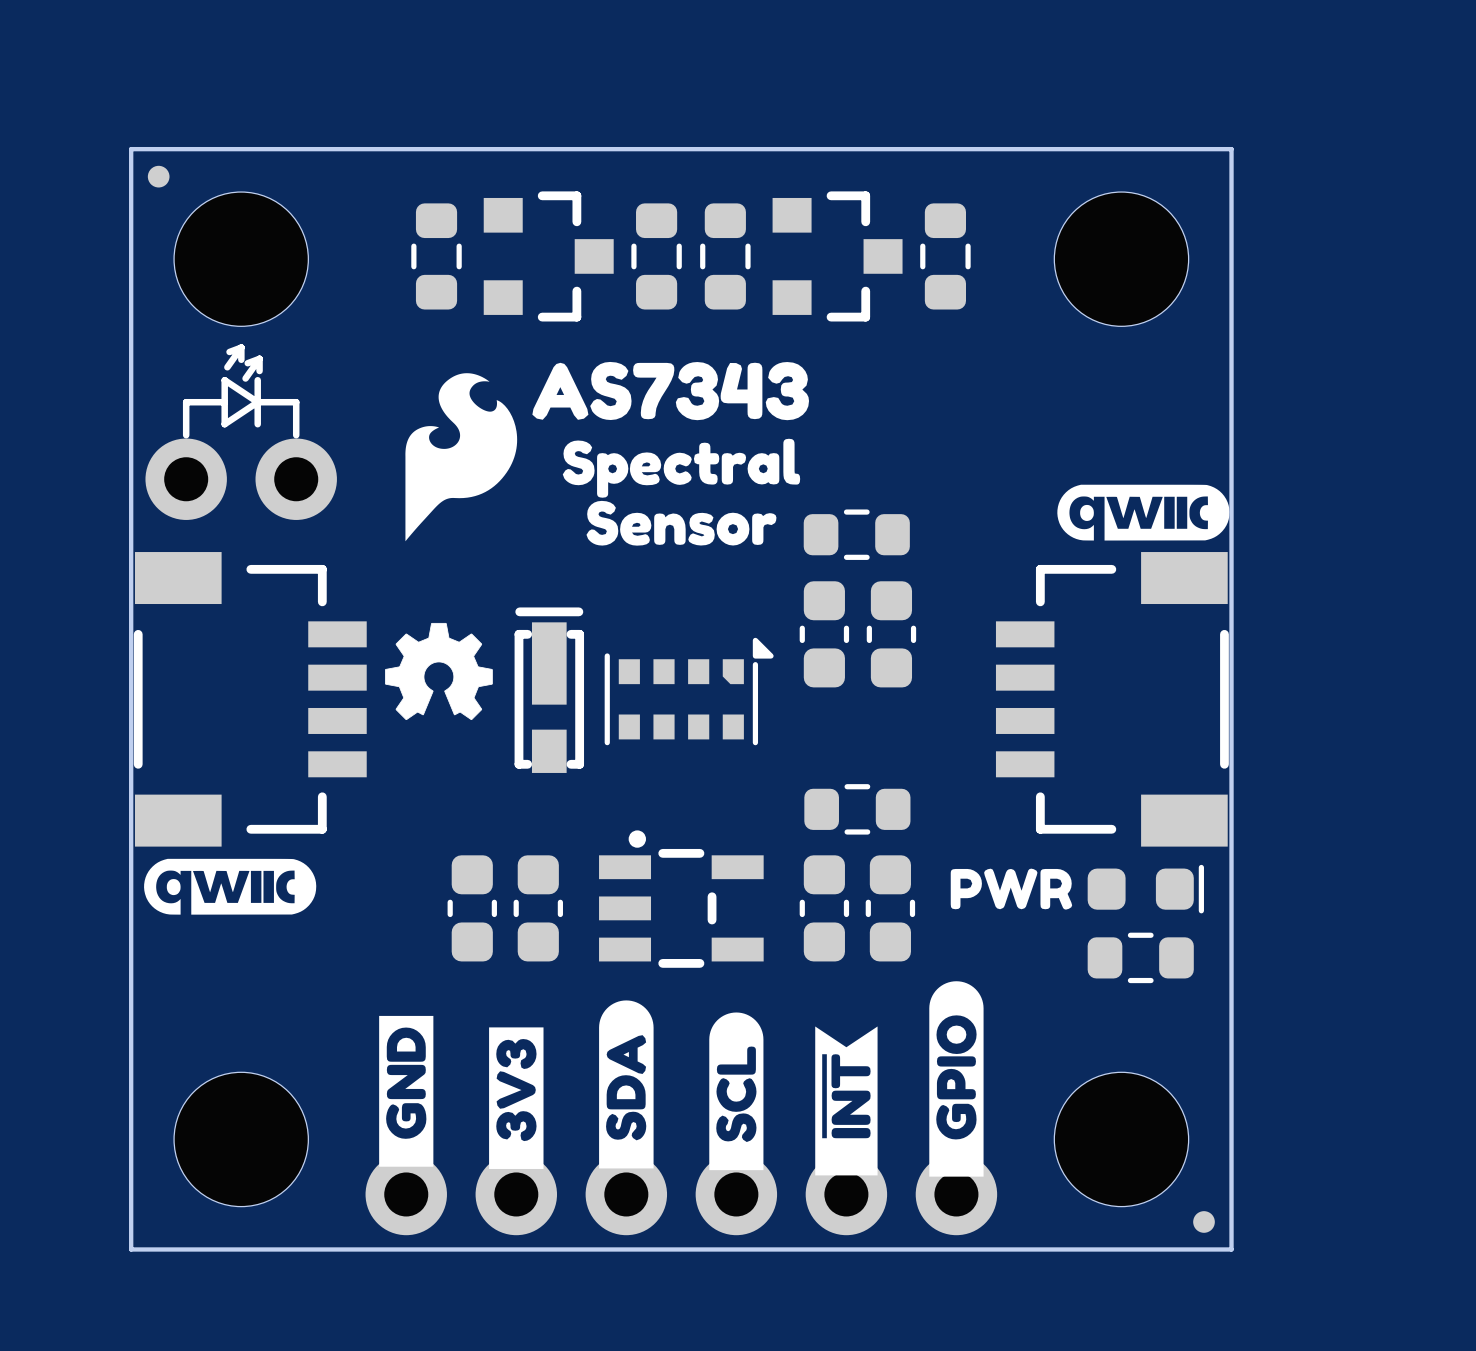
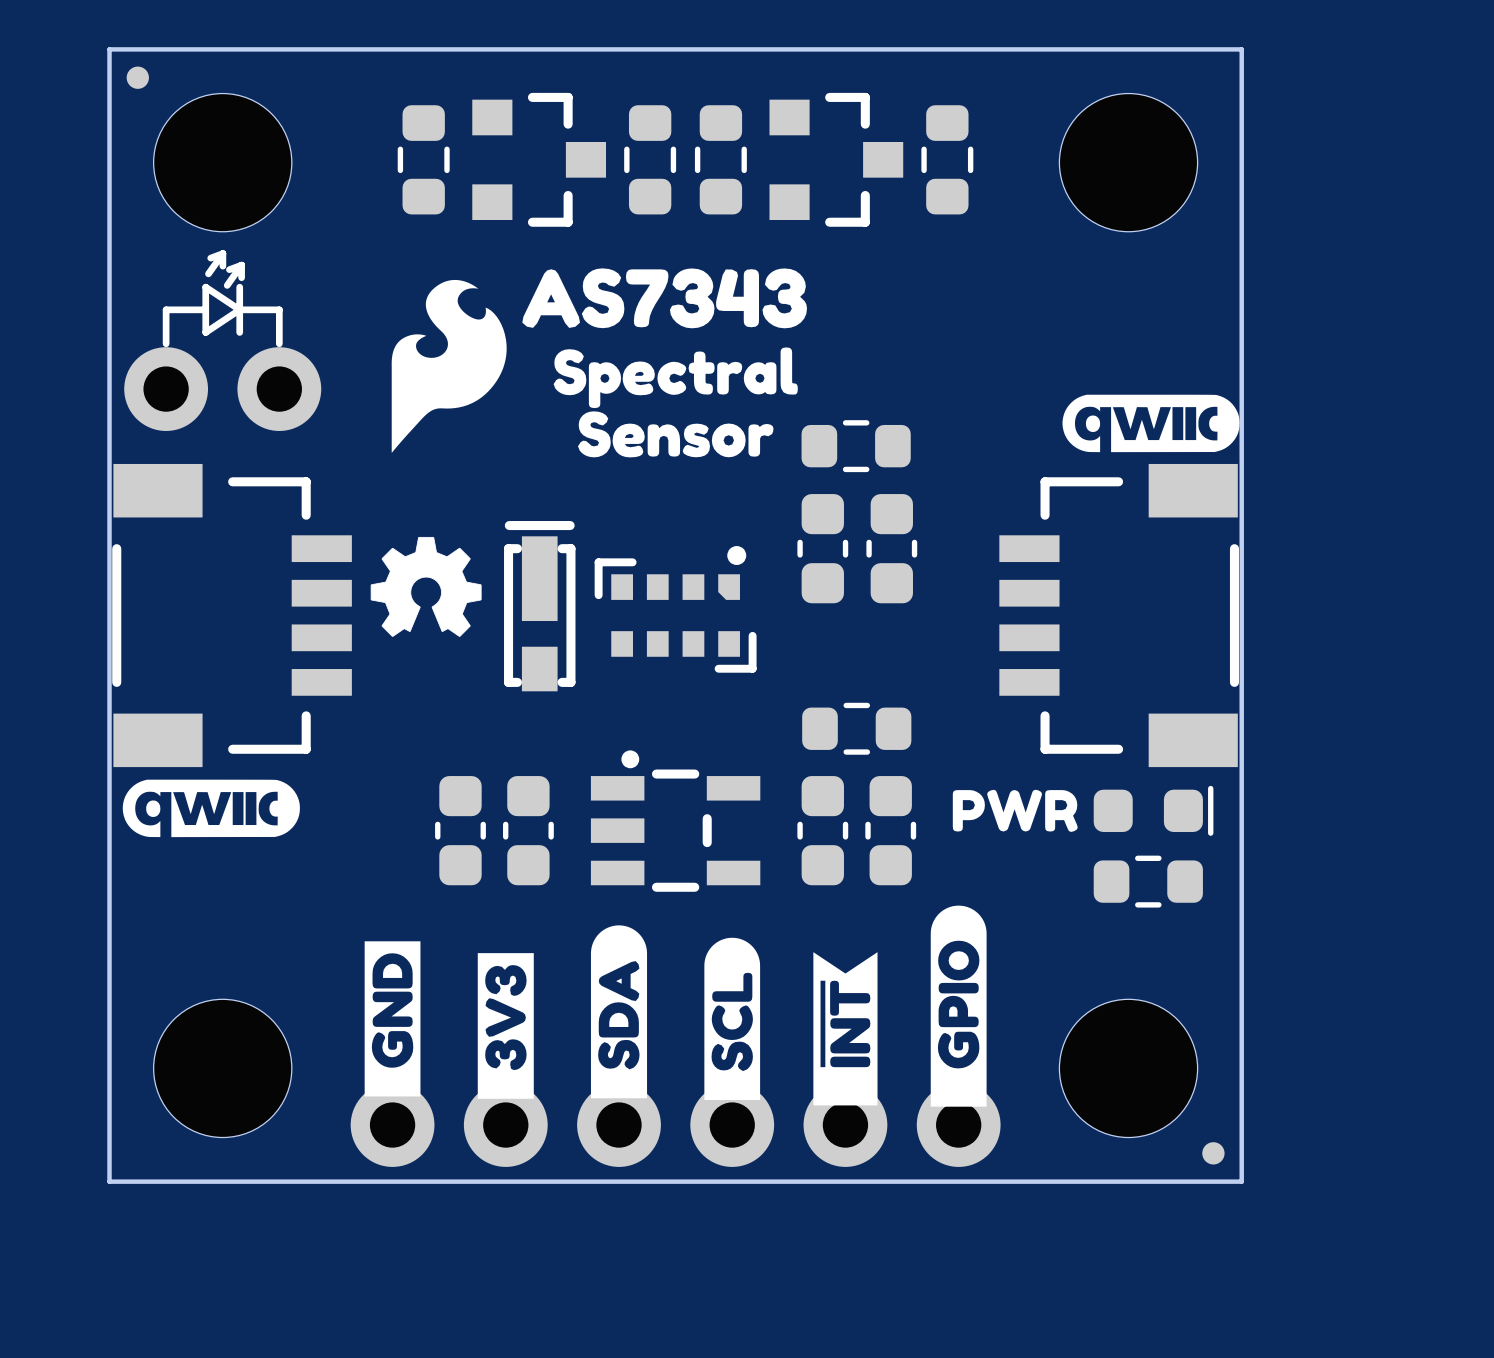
part footprint: [604, 637, 774, 746] -> [594, 546, 757, 673]

